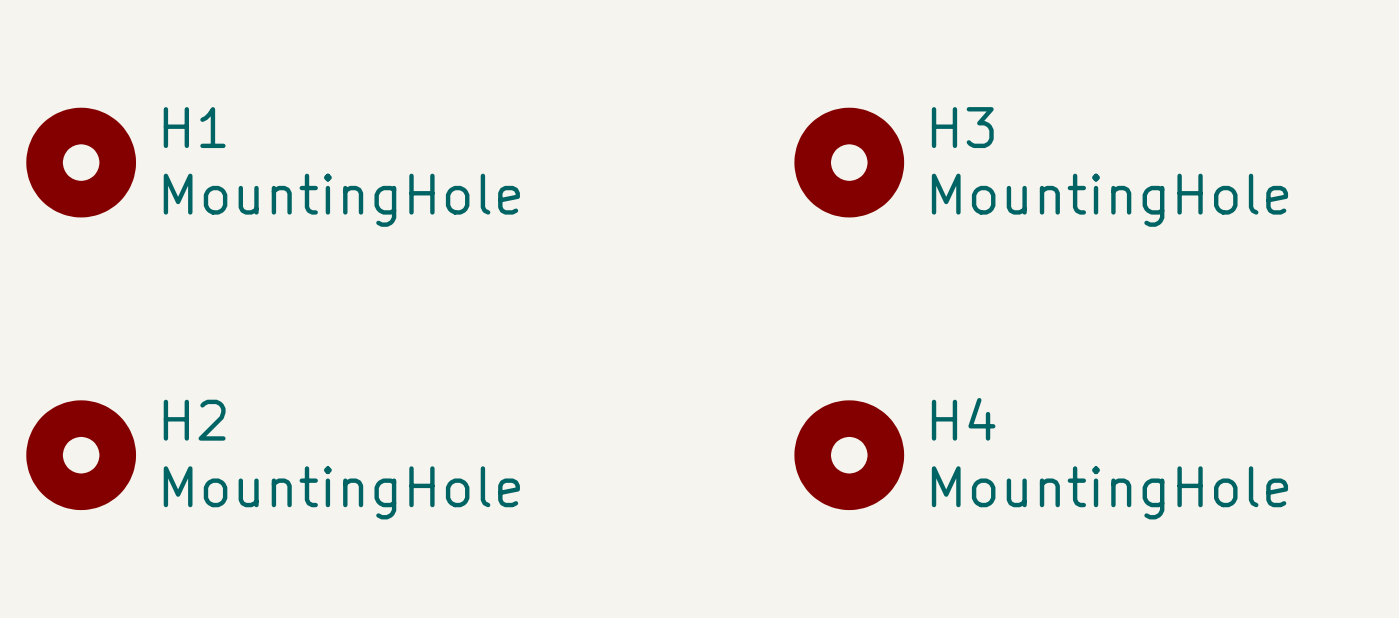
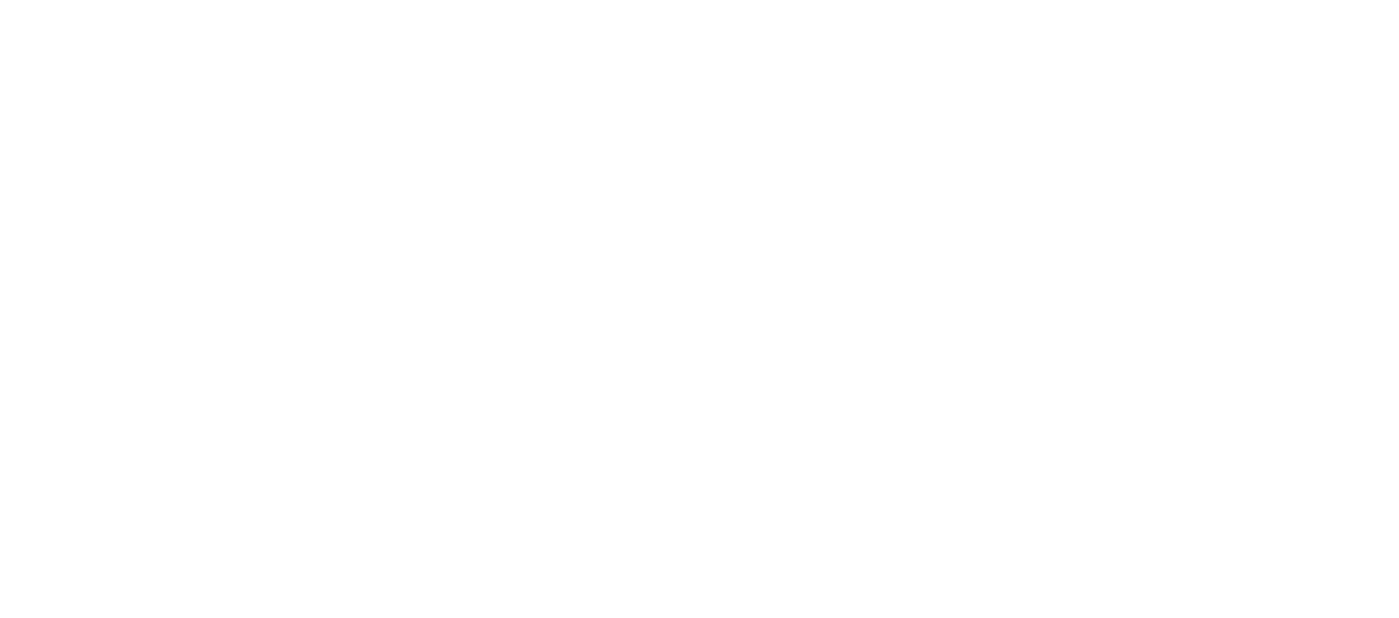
H1: MountingHole (81, 162) -> none
H3: MountingHole (849, 162) -> none
H2: MountingHole (81, 455) -> none
H4: MountingHole (849, 455) -> none

